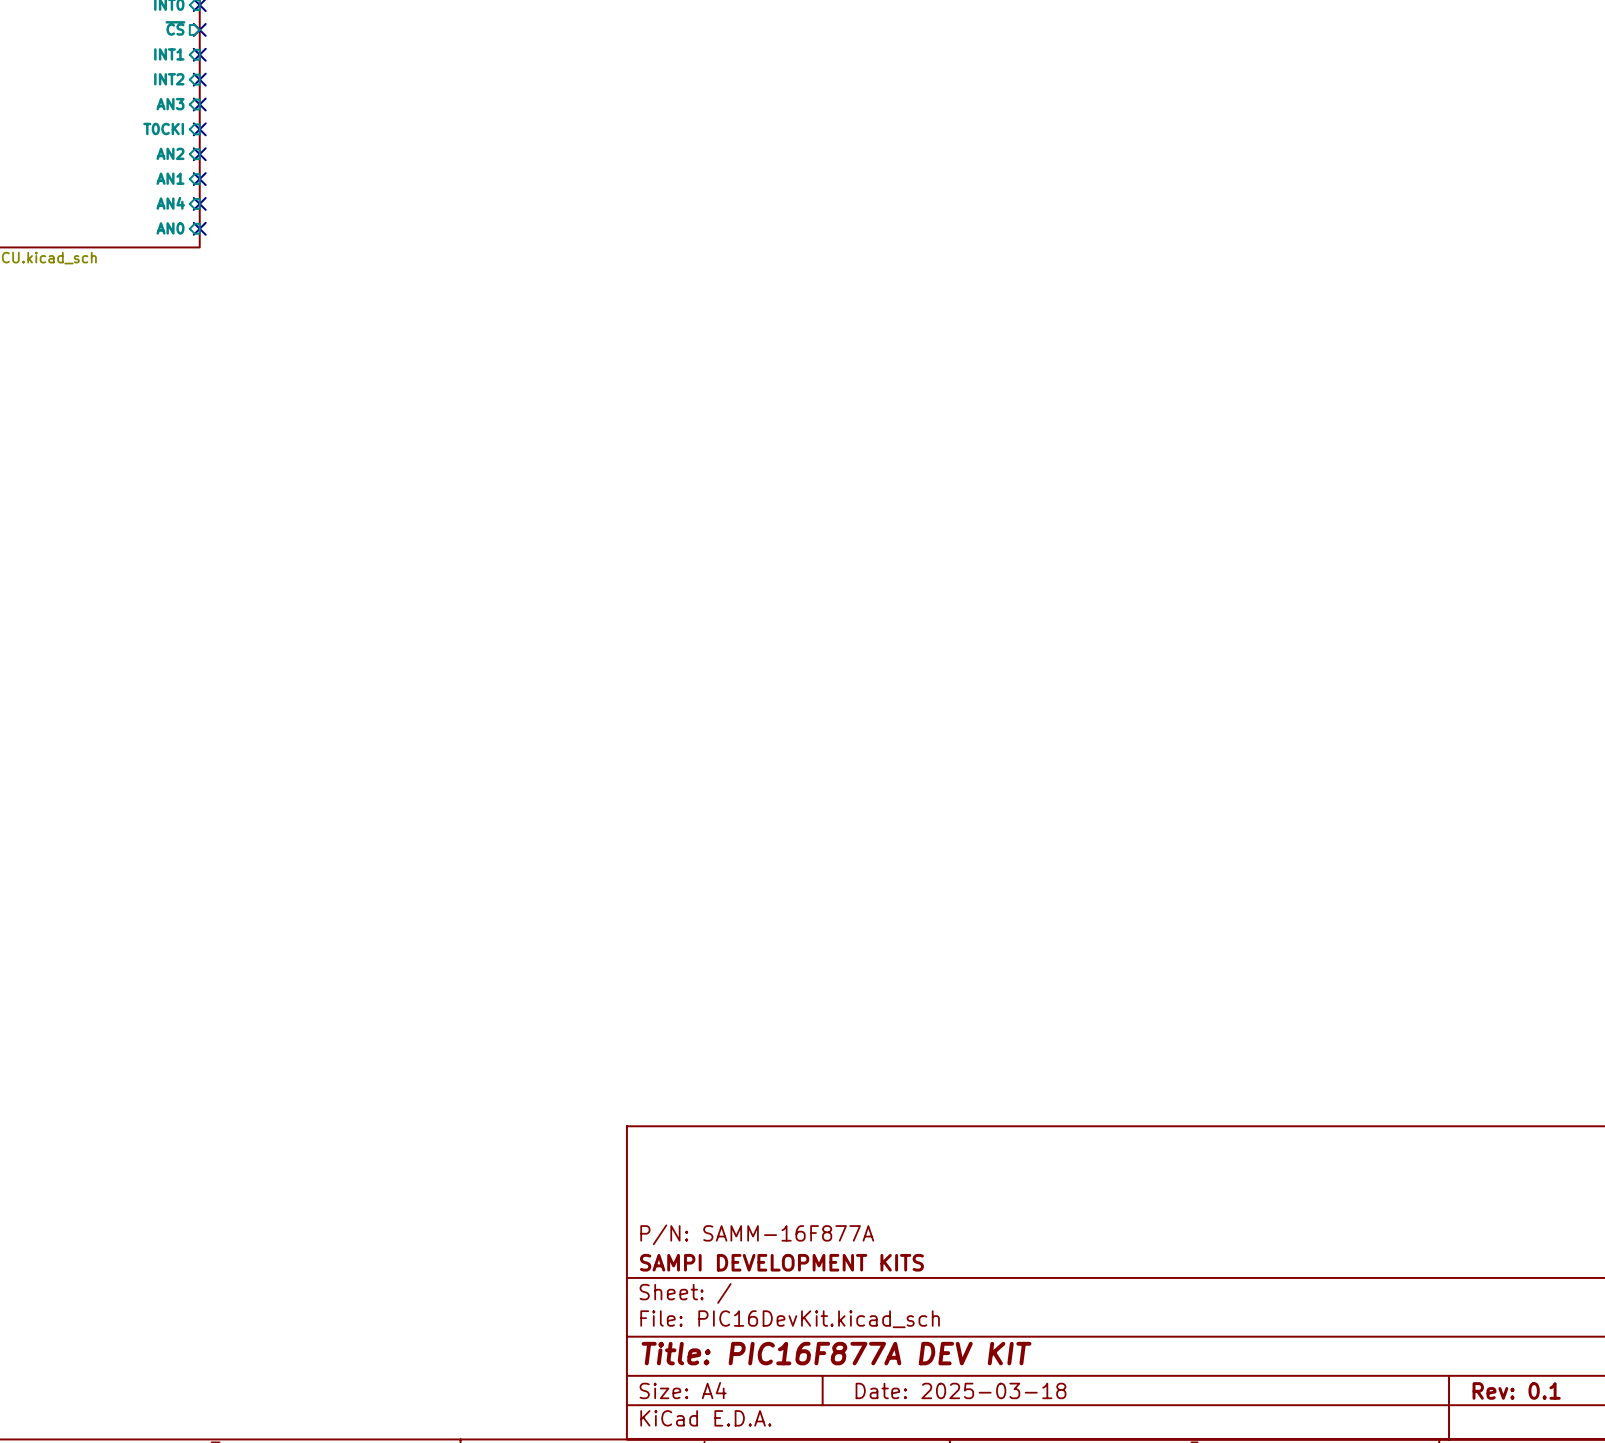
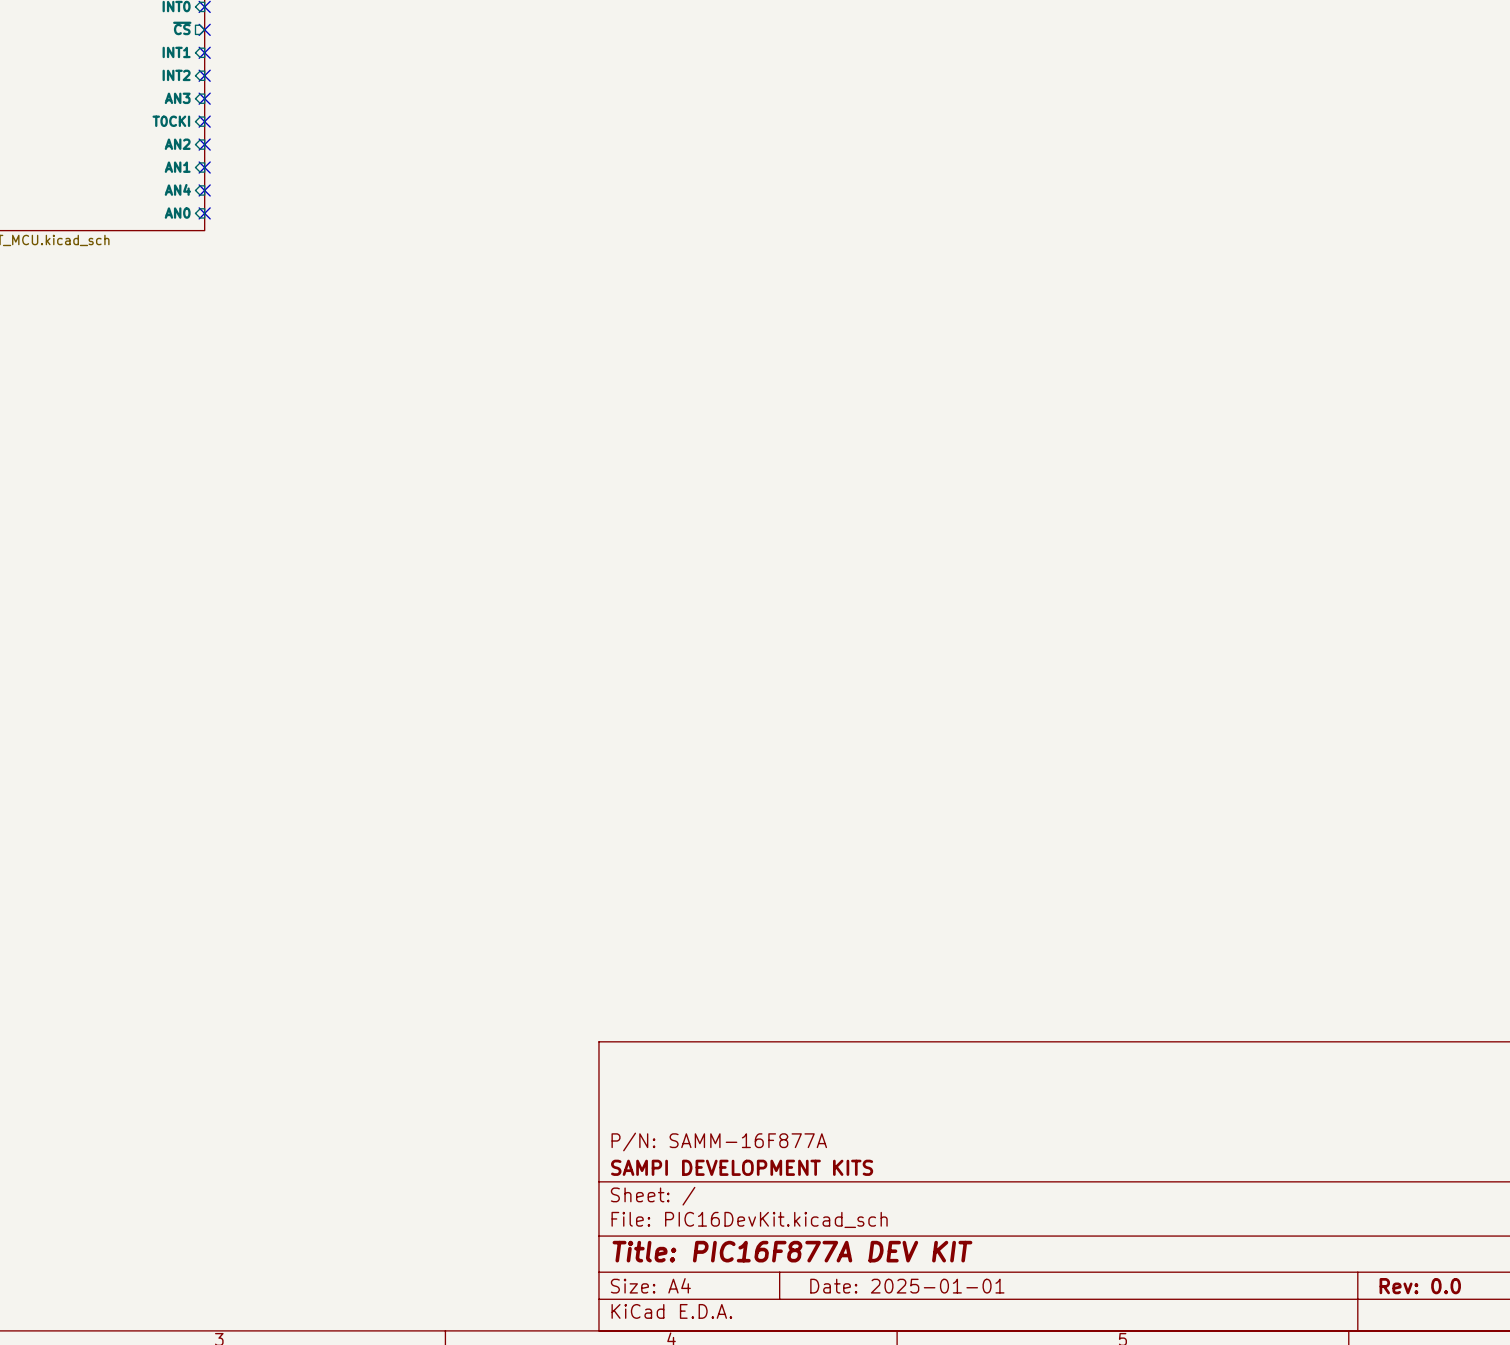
title block: Date: 2025-03-18 (961, 1390) -> Date: 2025-01-01 (907, 1286)
title block: Rev: 0.1 (1516, 1390) -> Rev: 0.0 (1420, 1286)

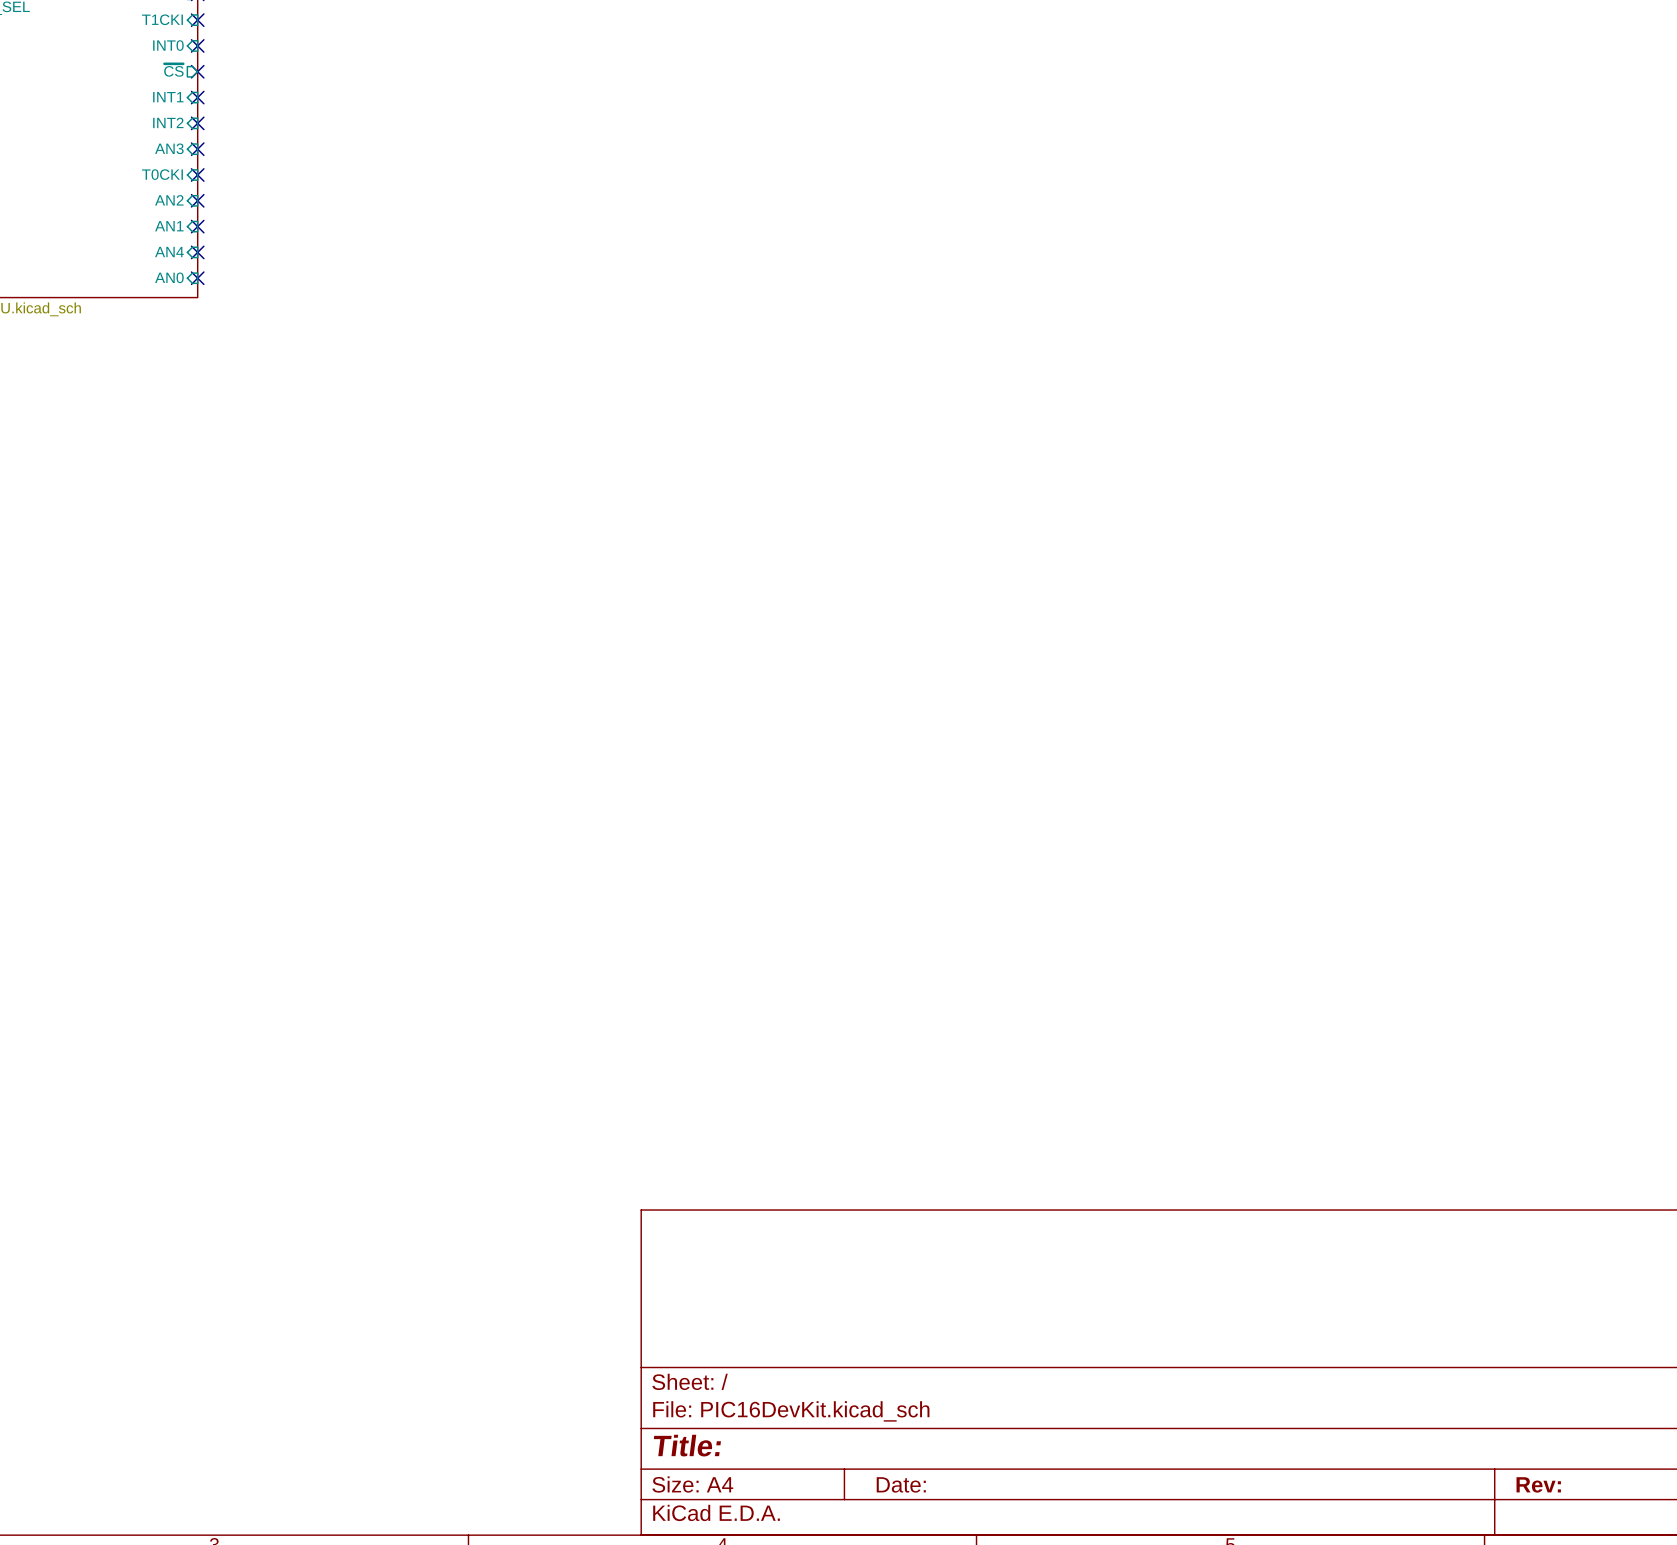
title block: P/N: SAMM-16F877A (719, 1141) -> none
title block: SAMPI DEVELOPMENT KITS (742, 1167) -> none
title block: Title: PIC16F877A DEV KIT (792, 1251) -> Title: (687, 1445)
title block: Date: 2025-01-01 (907, 1286) -> Date: (901, 1484)
title block: Rev: 0.0 (1420, 1286) -> Rev: (1538, 1484)

